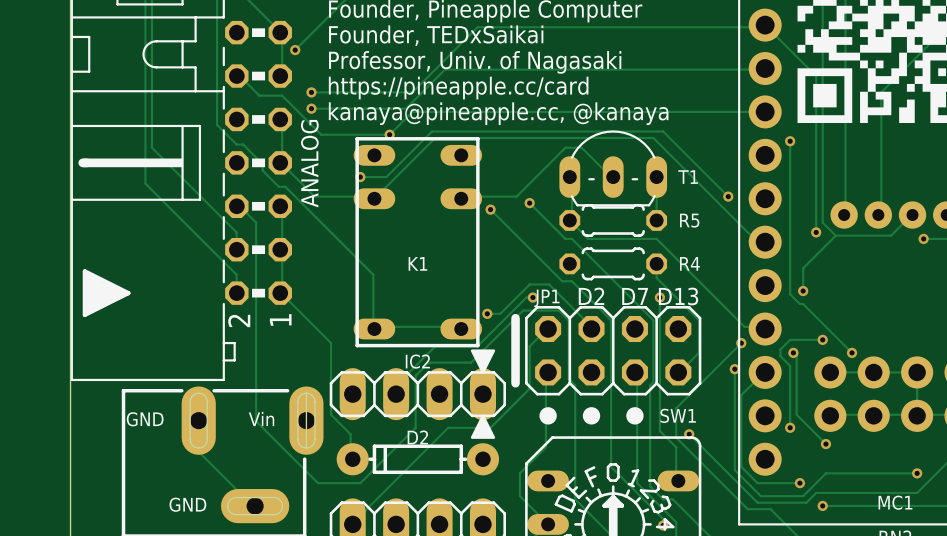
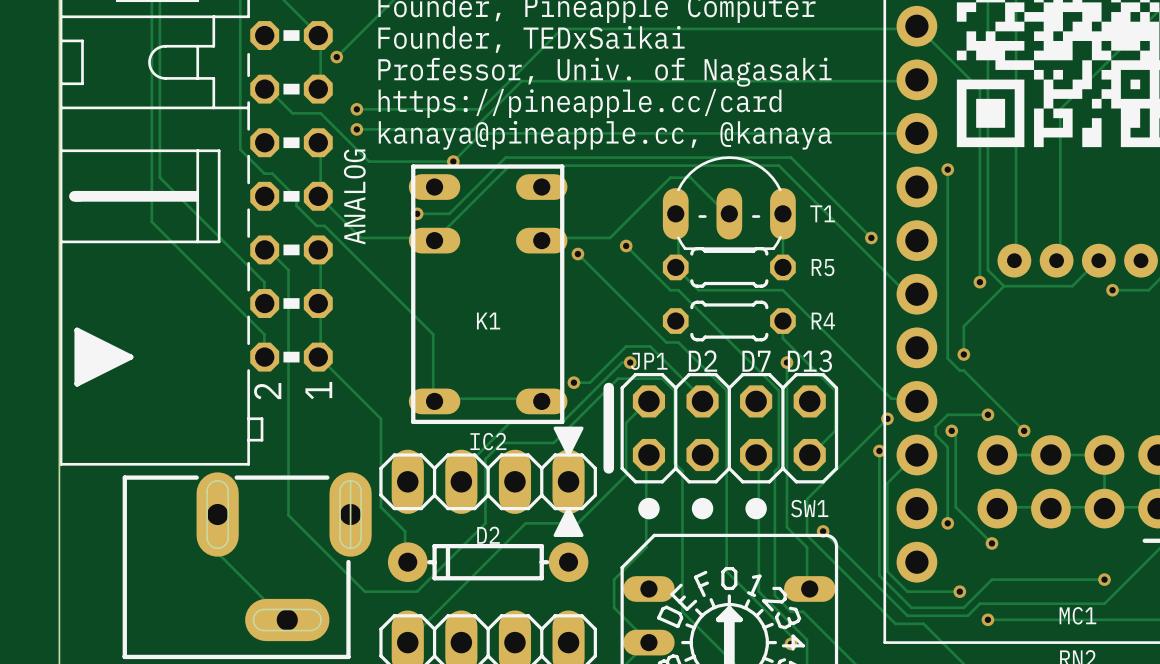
text: Vin (261, 418) -> none
text: GND (145, 419) -> none
text: GND (187, 504) -> none

